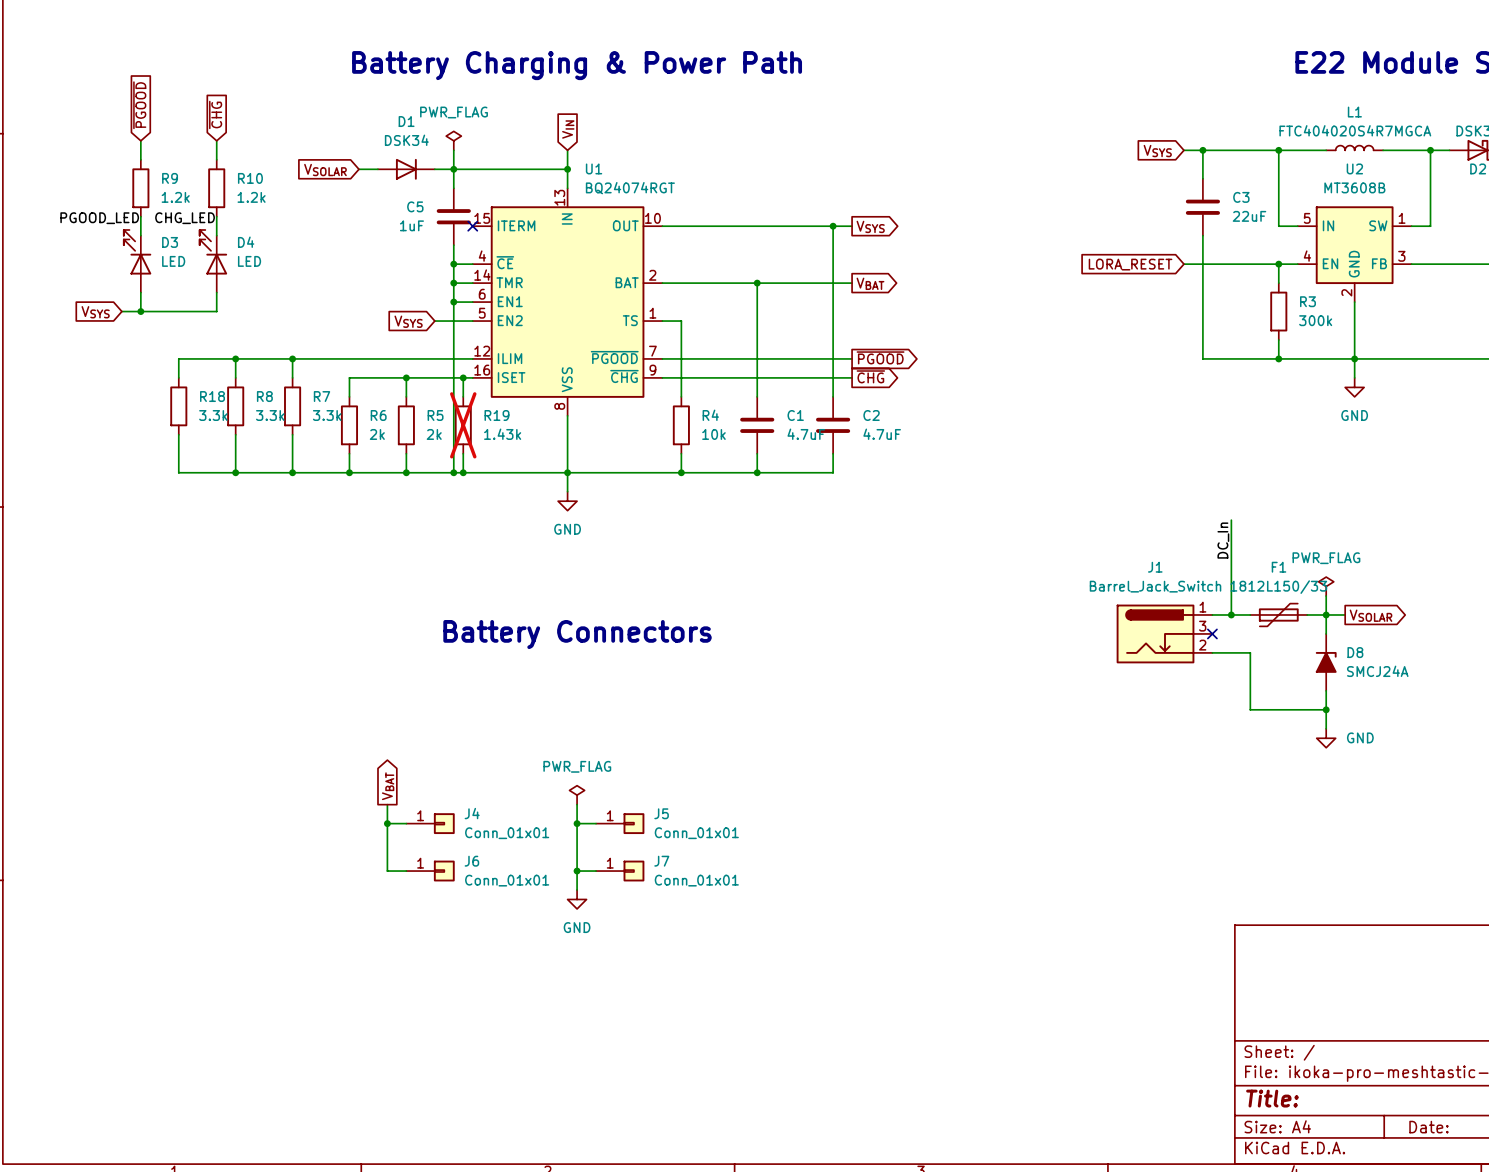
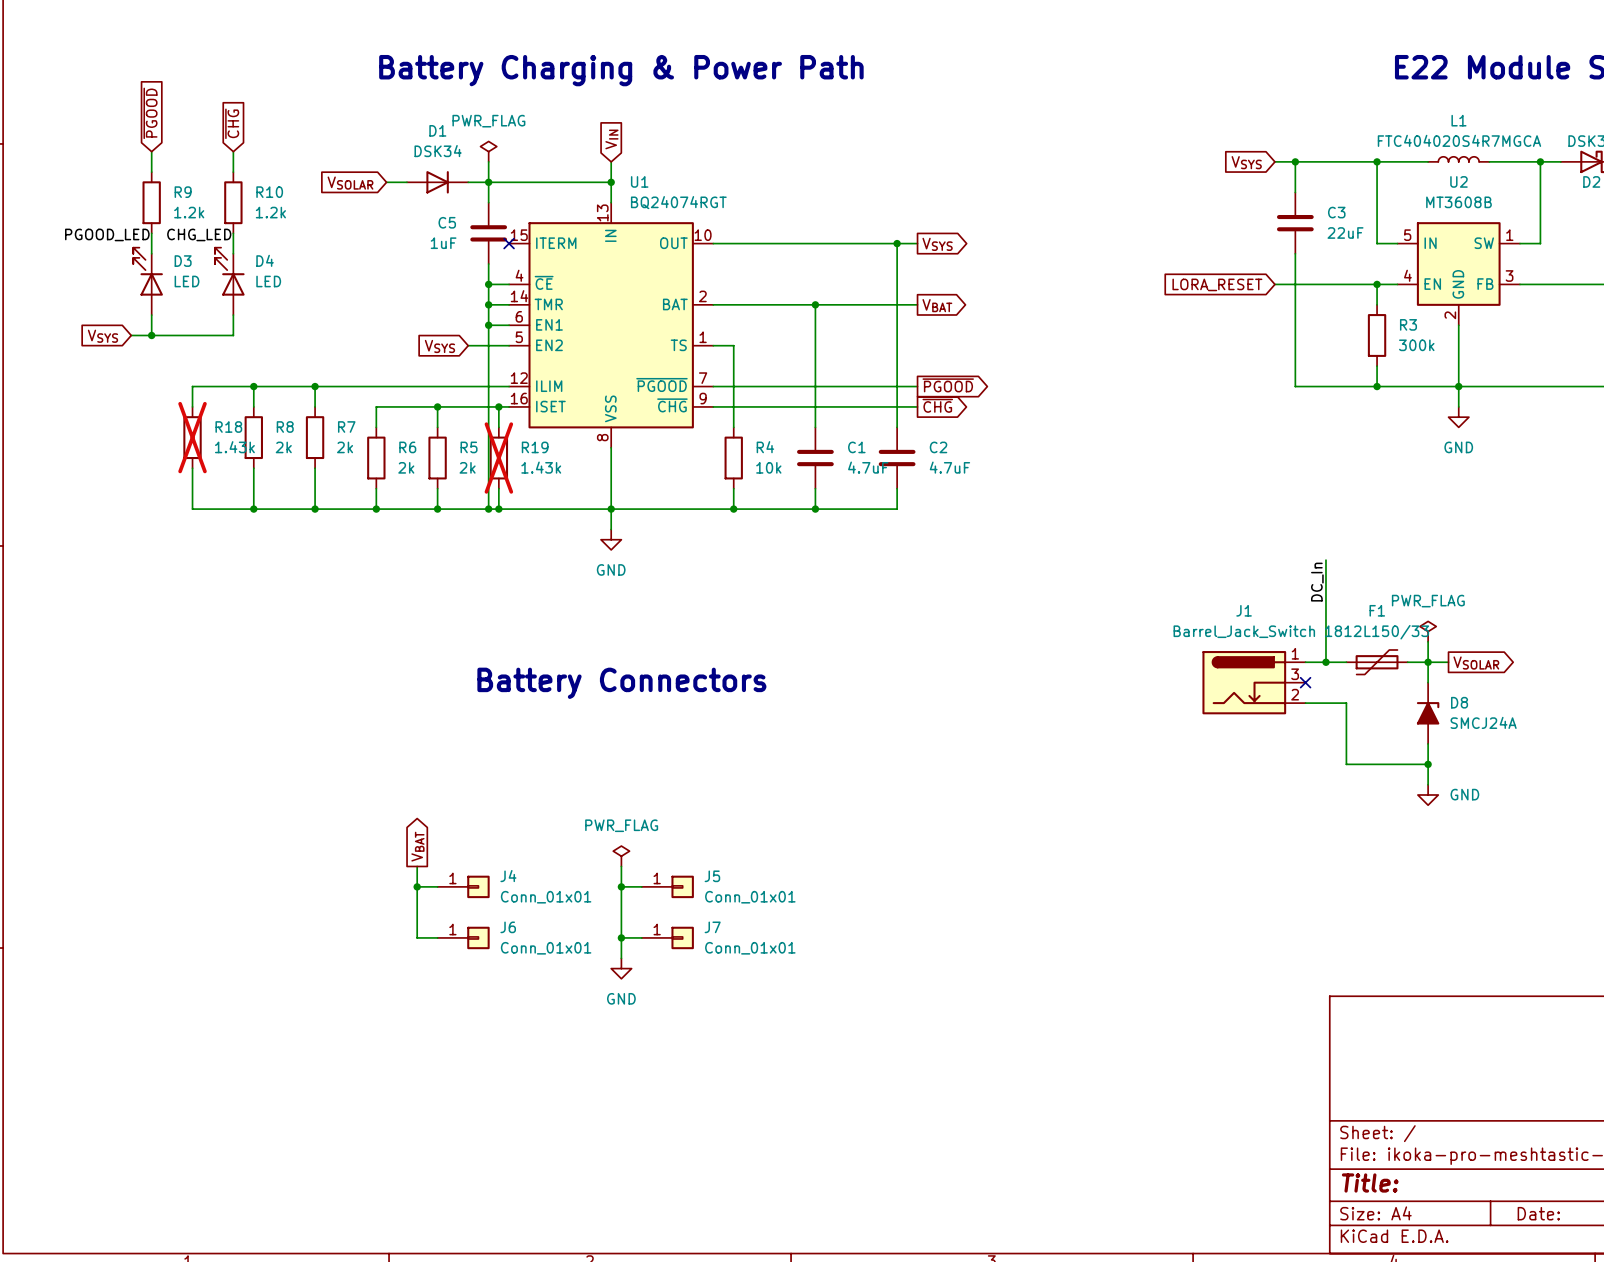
R18 do-not-place cross: none -> (192, 437)
R18 value: 3.3k (213, 415) -> 1.43k (234, 447)
R8 value: 3.3k (270, 415) -> 2k (283, 447)
R7 value: 3.3k (327, 415) -> 2k (345, 447)

